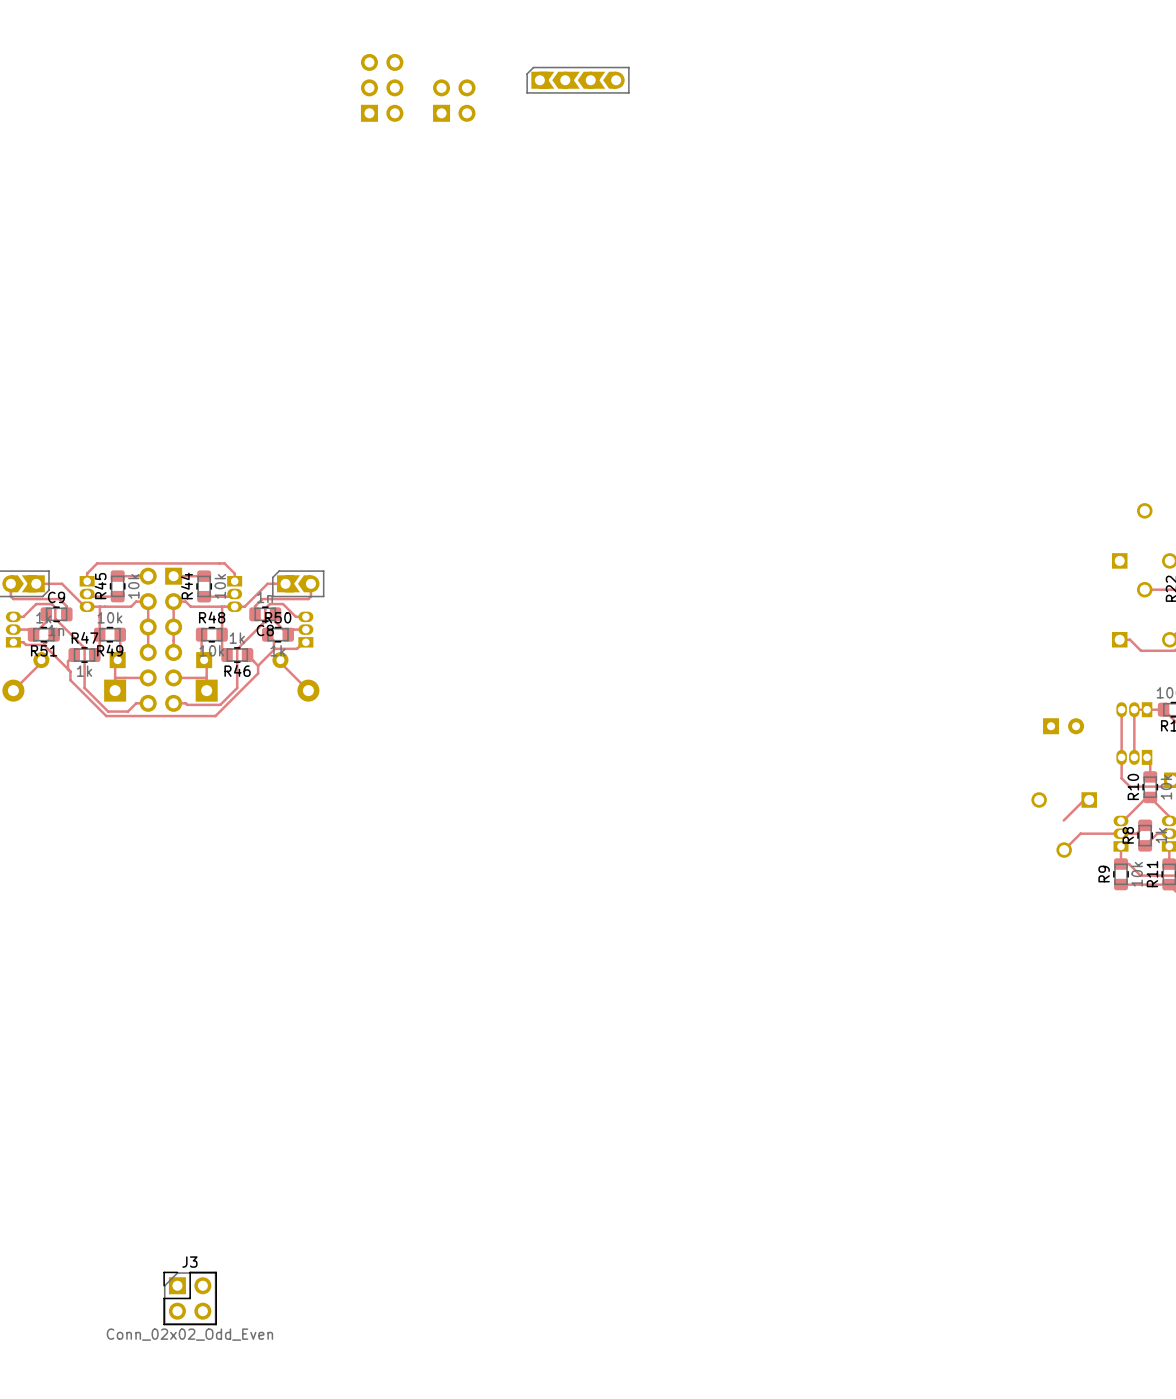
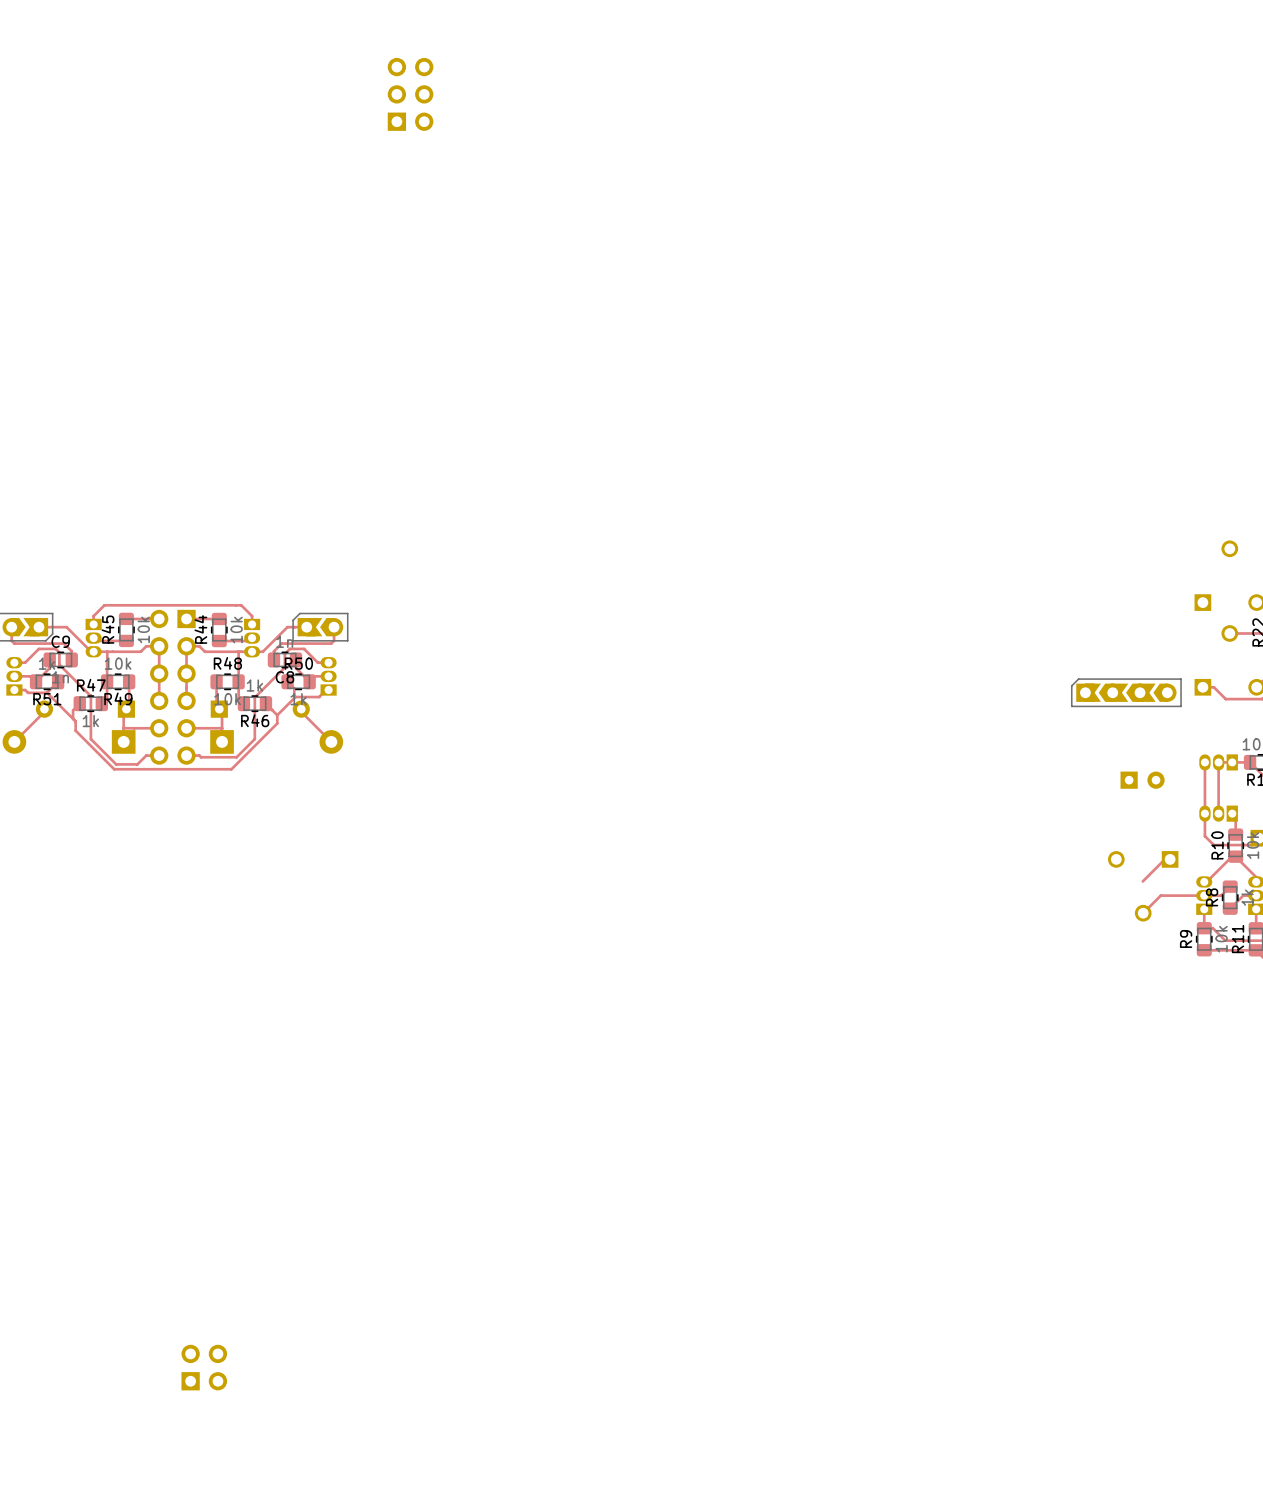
part: (578, 80) -> none
part: (454, 100) -> none
part: none -> (1126, 692)
J3 side: top (190, 1298) -> bottom (204, 1367)

